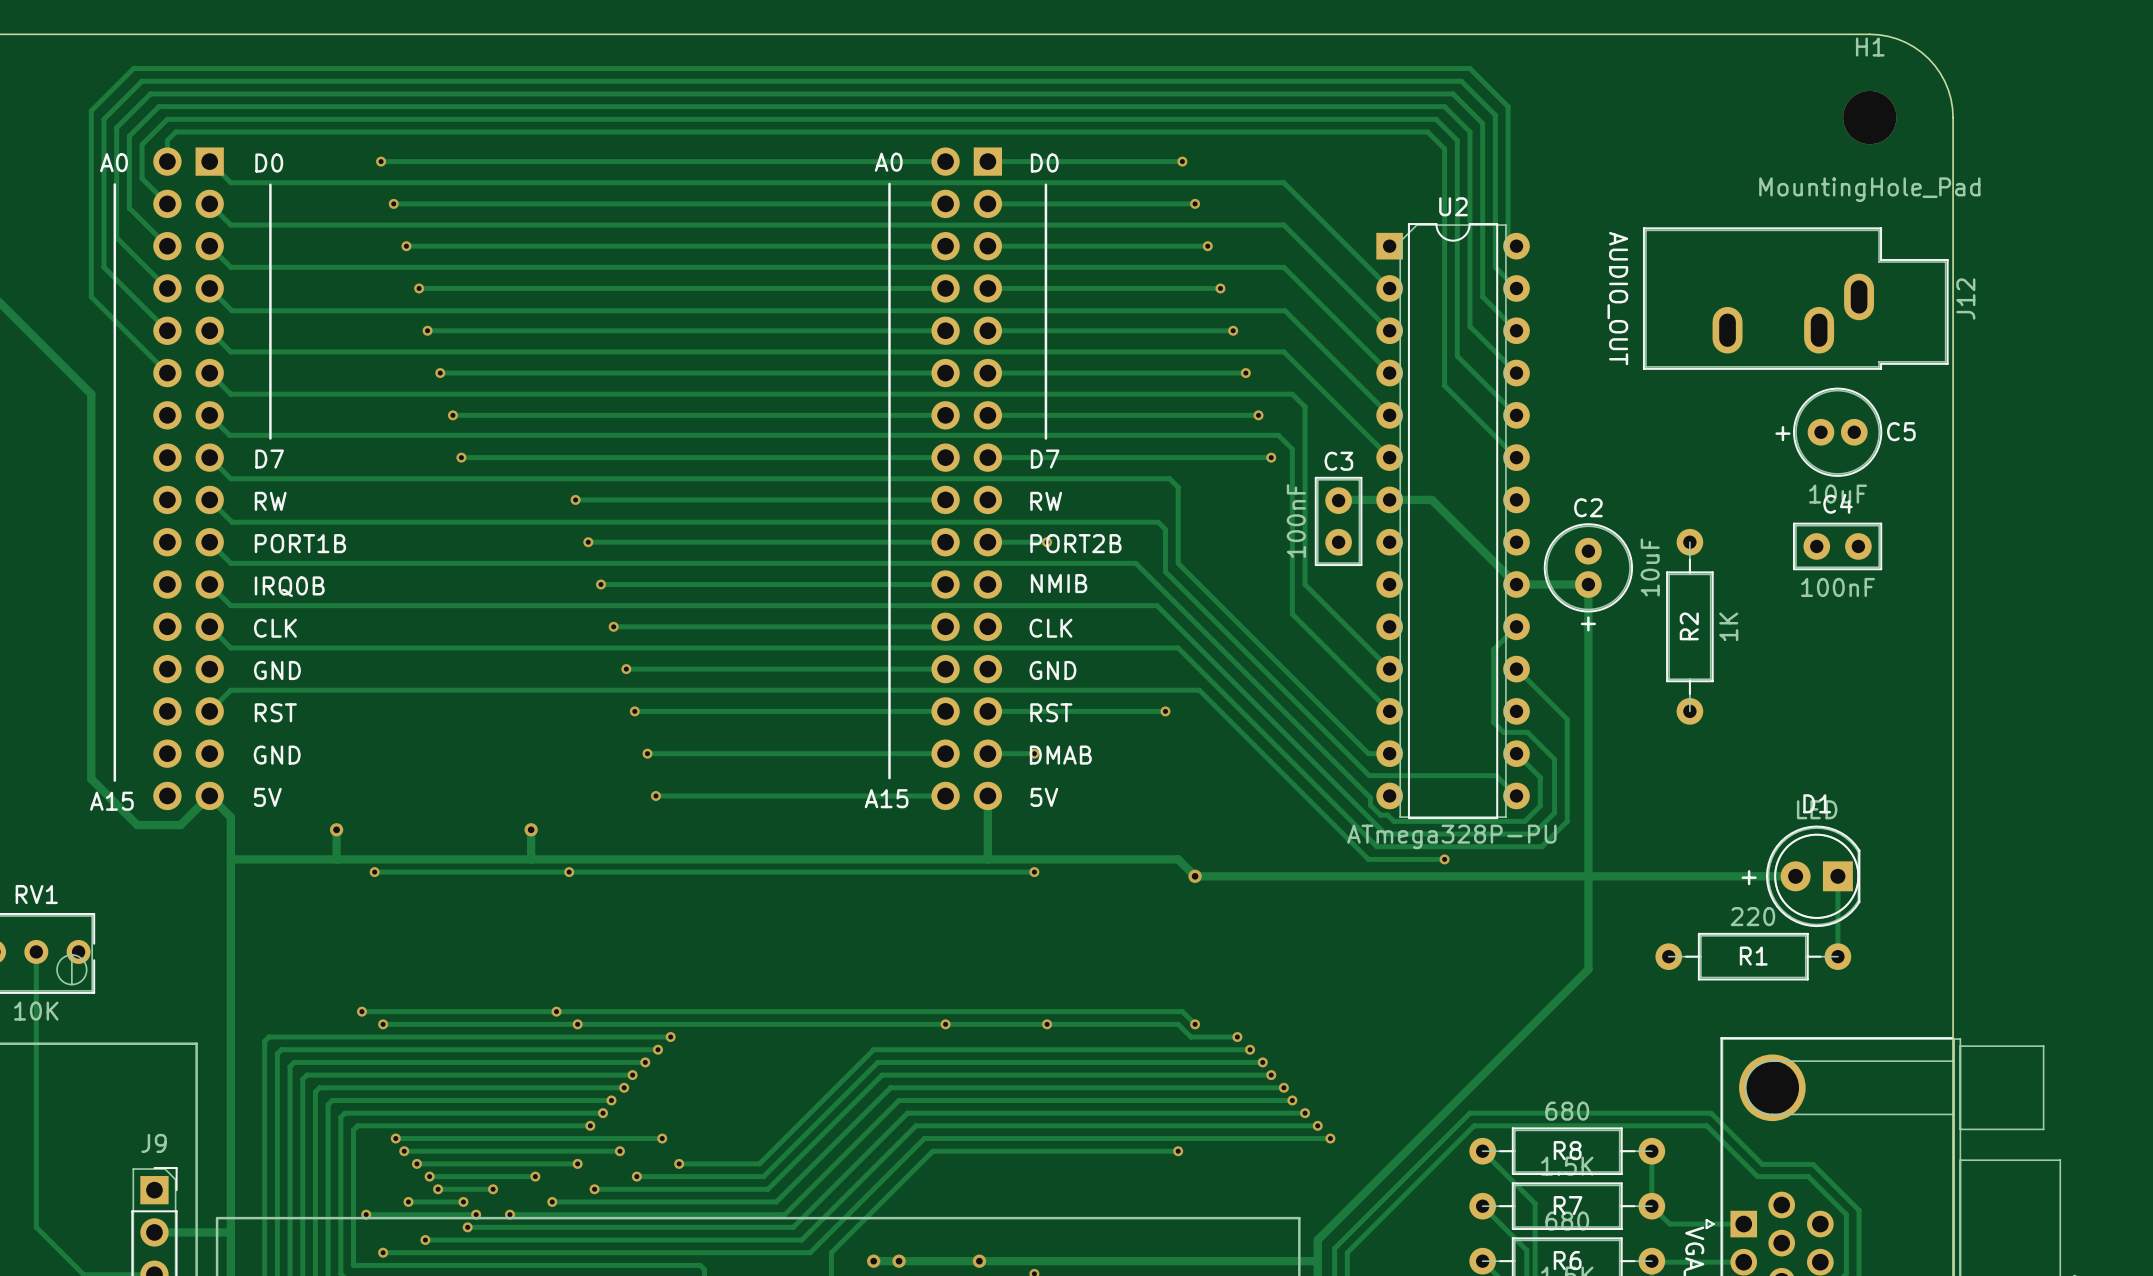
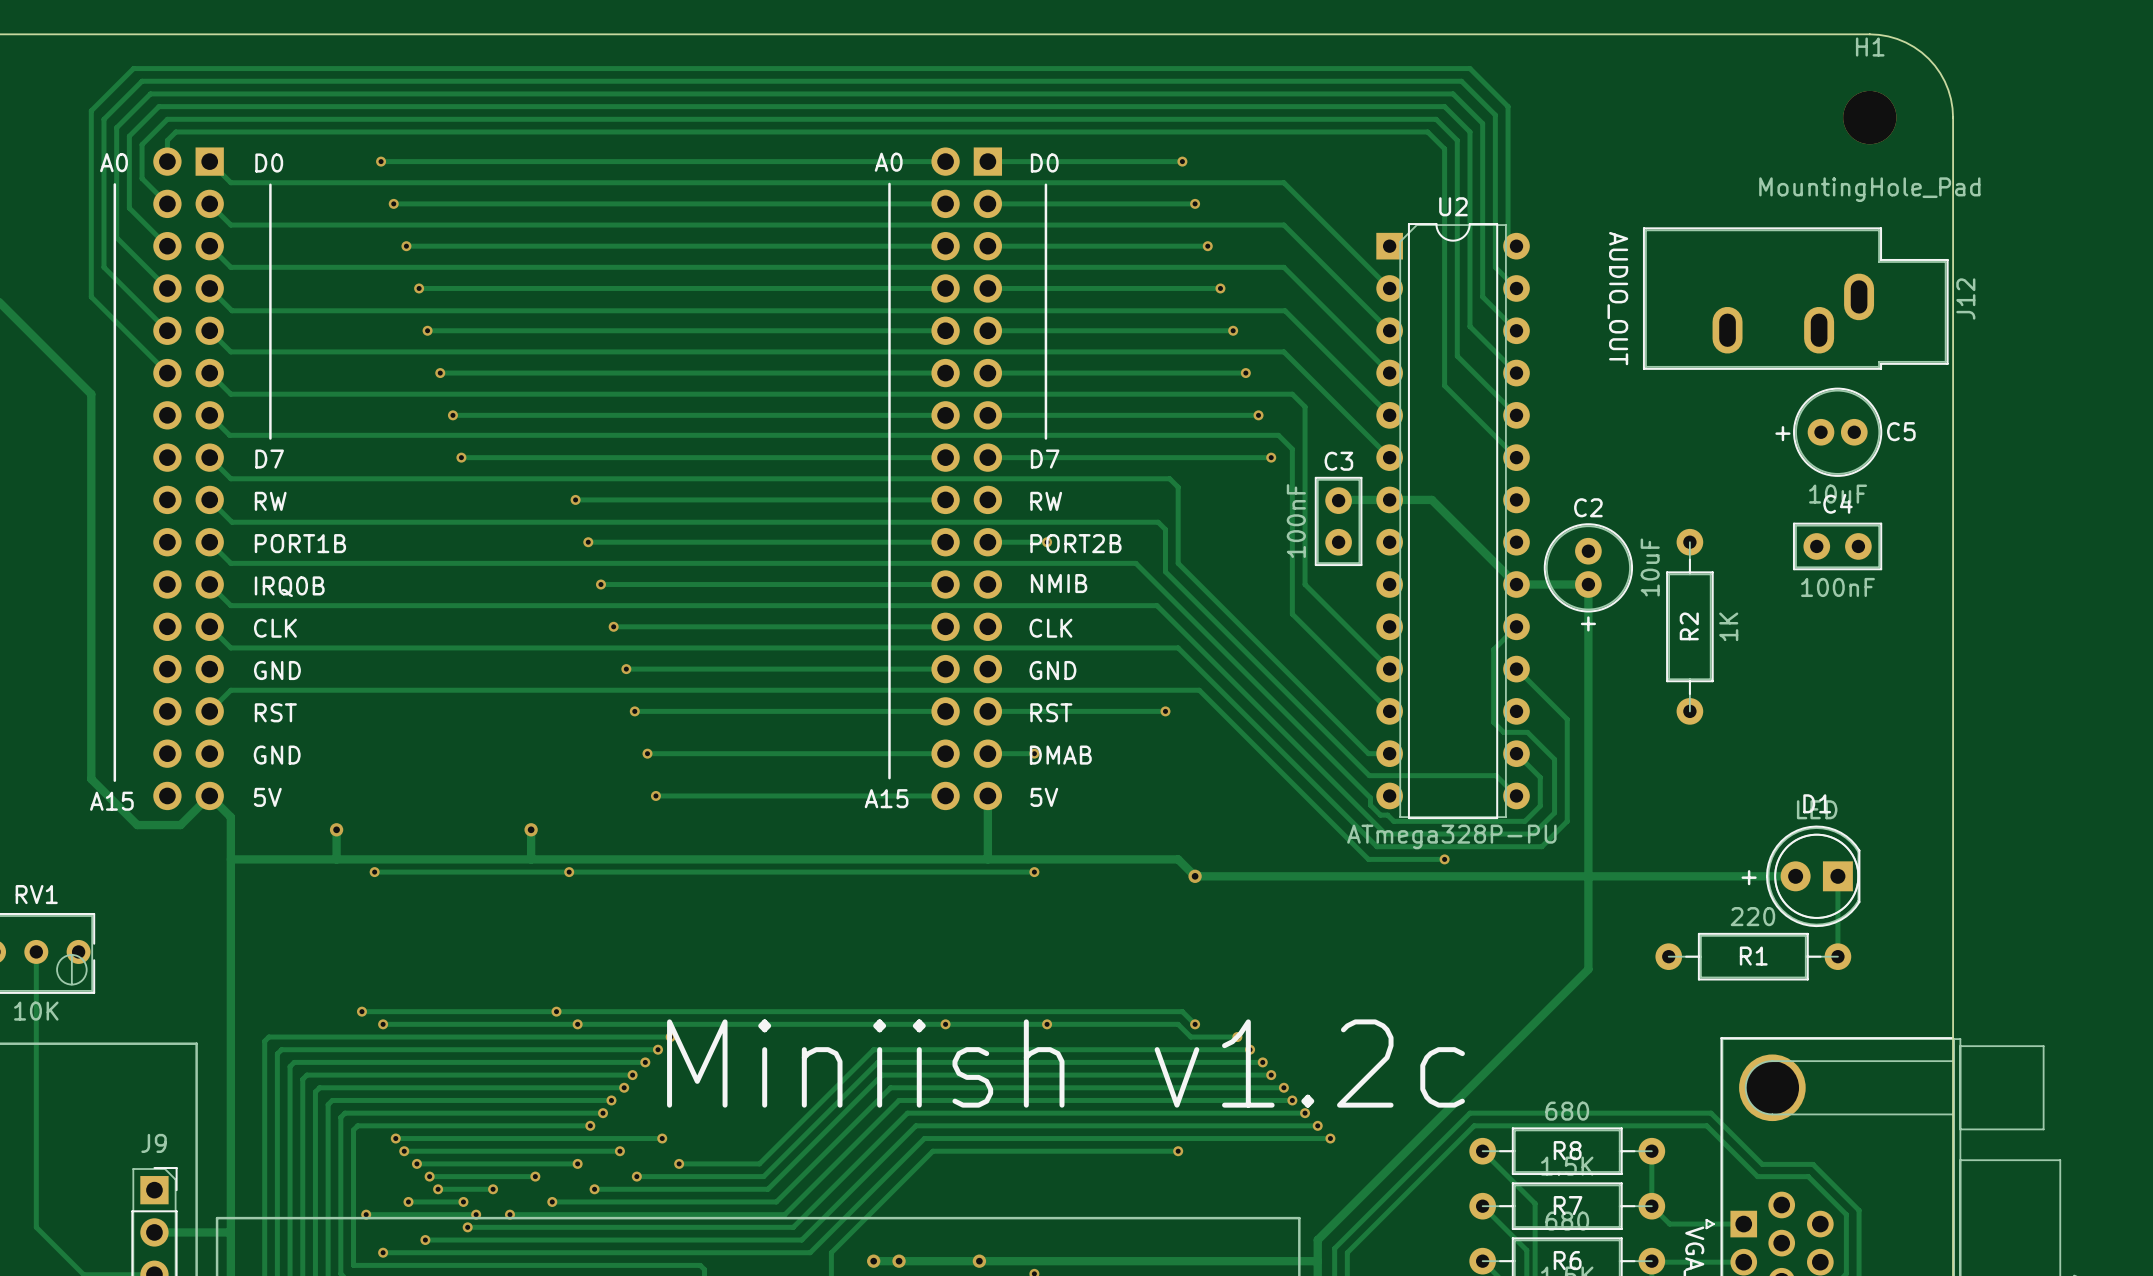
text: none -> Miniish v1.2c (1065, 1063)

